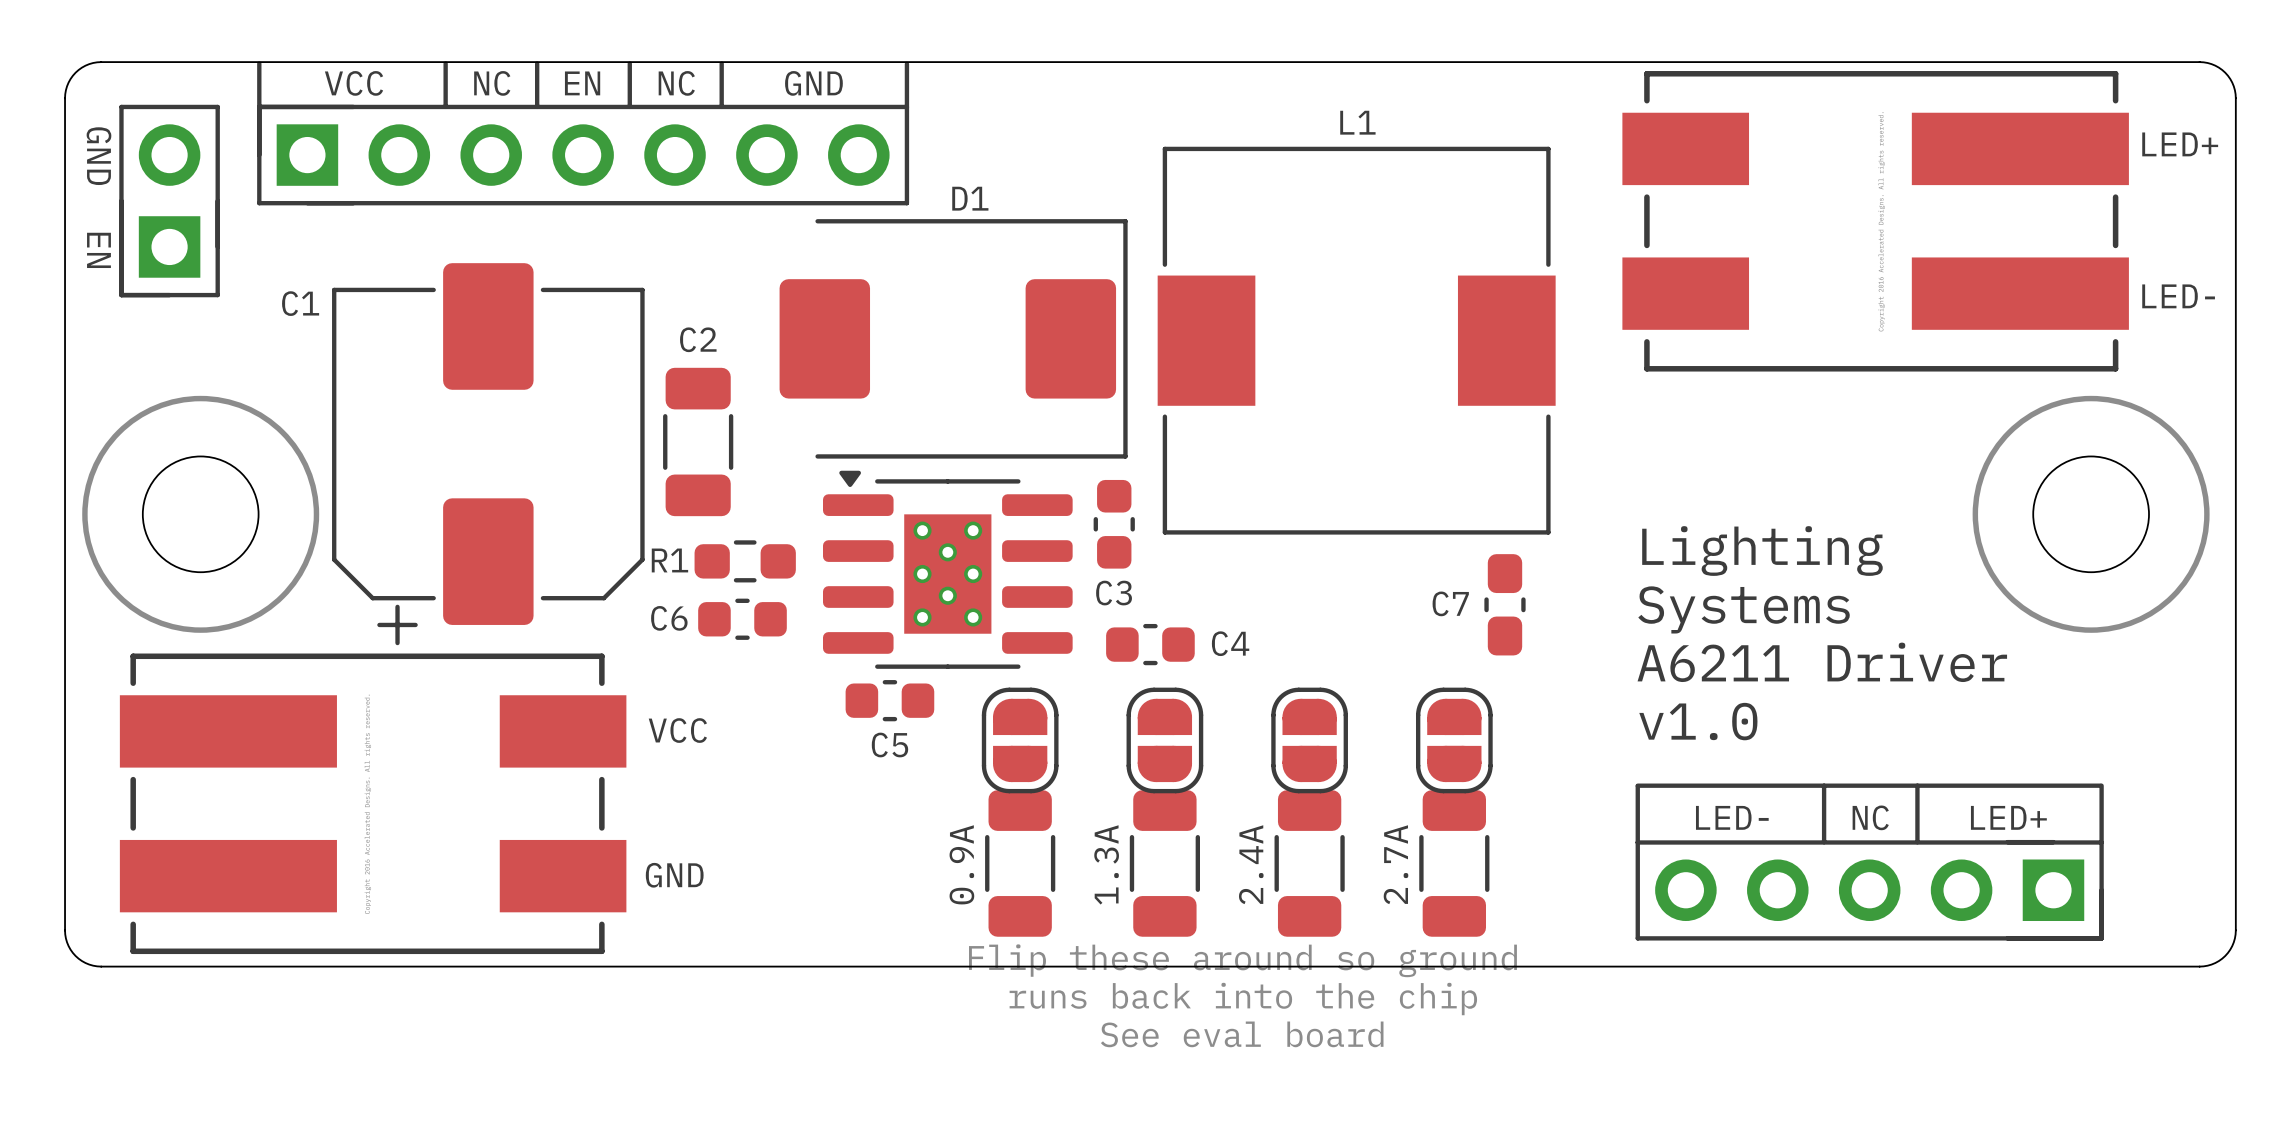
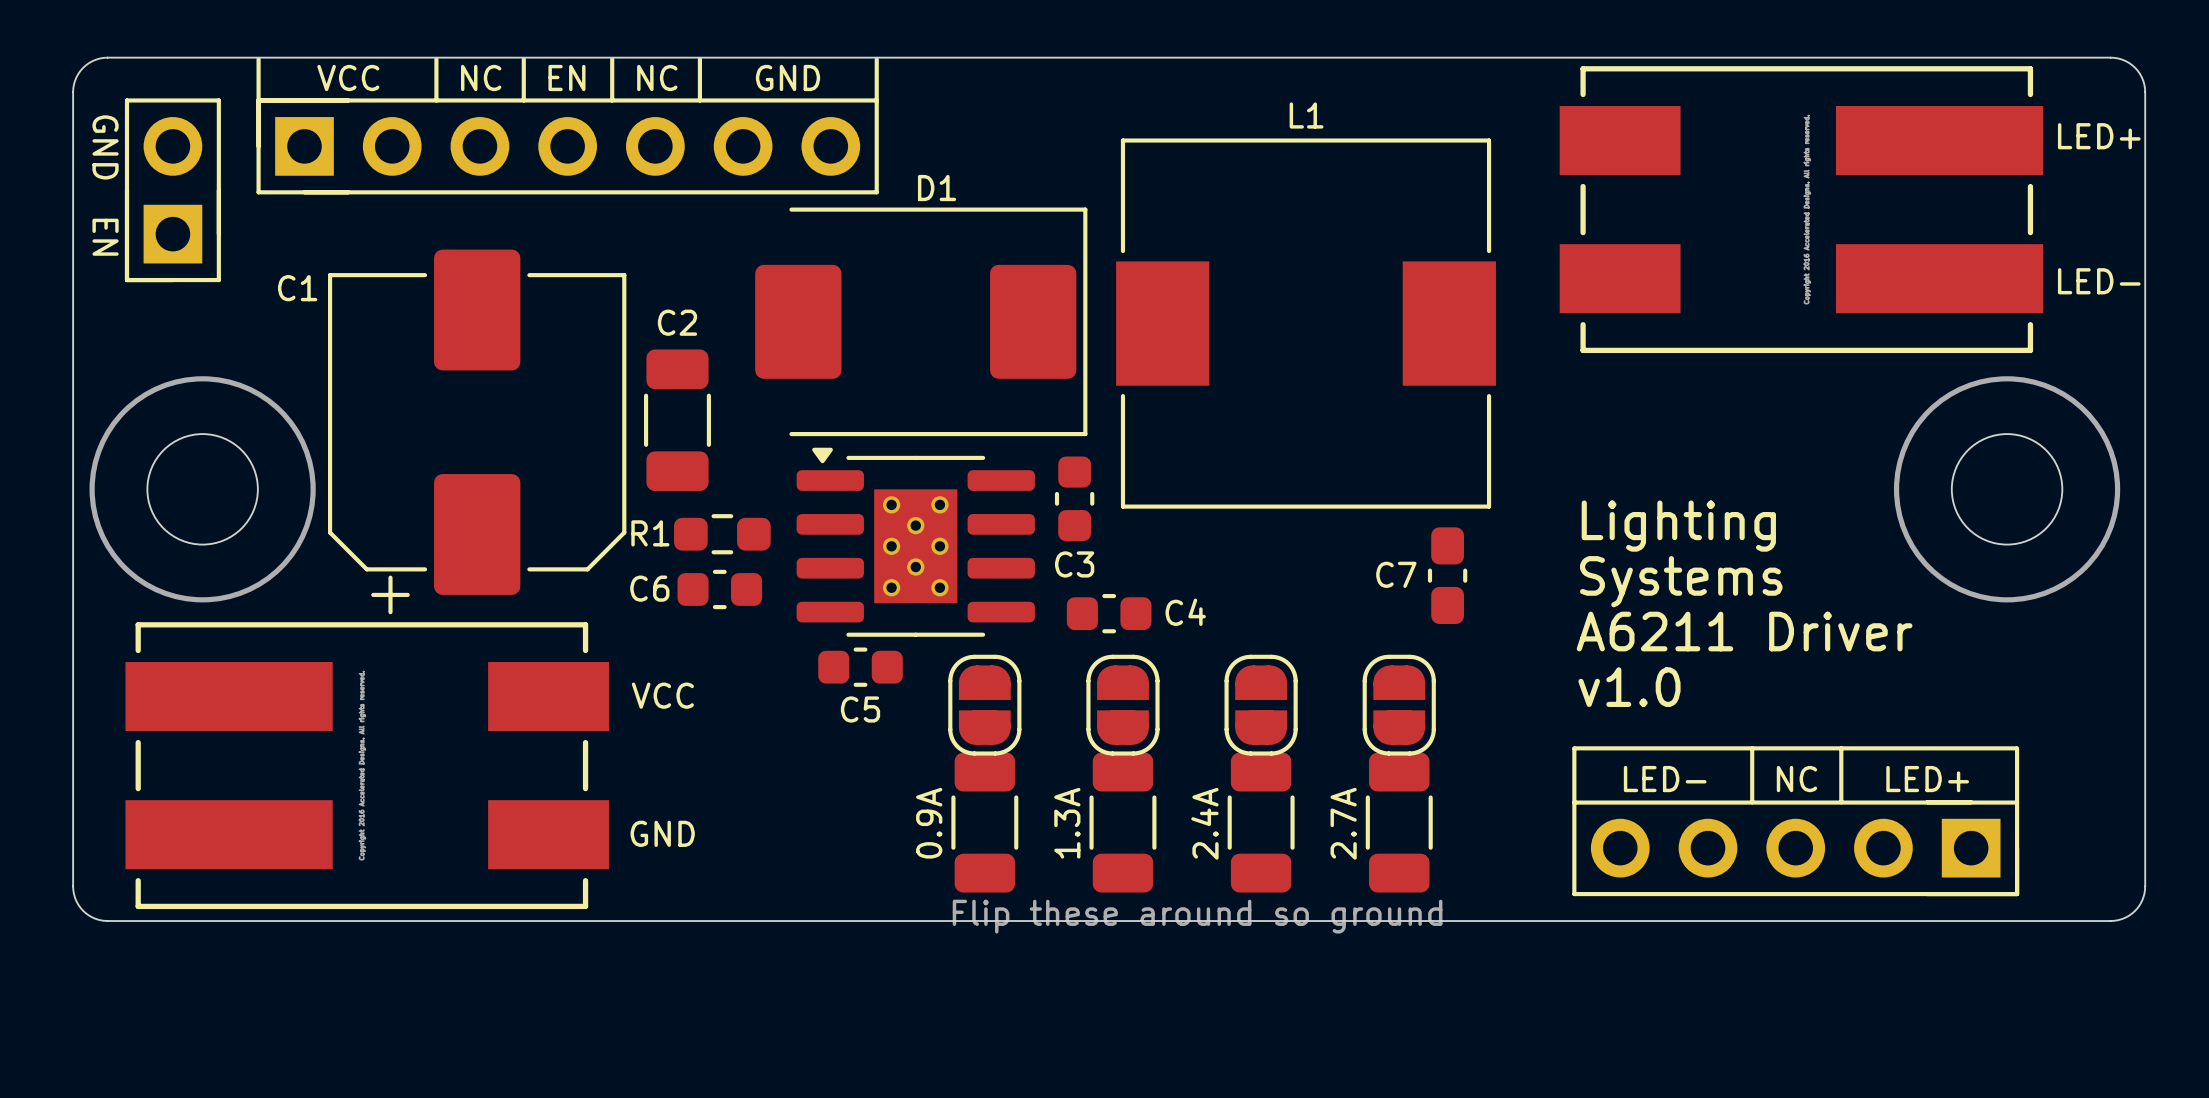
text: runs back into the chip (1243, 999) -> none
text: See eval board (1242, 1034) -> none

